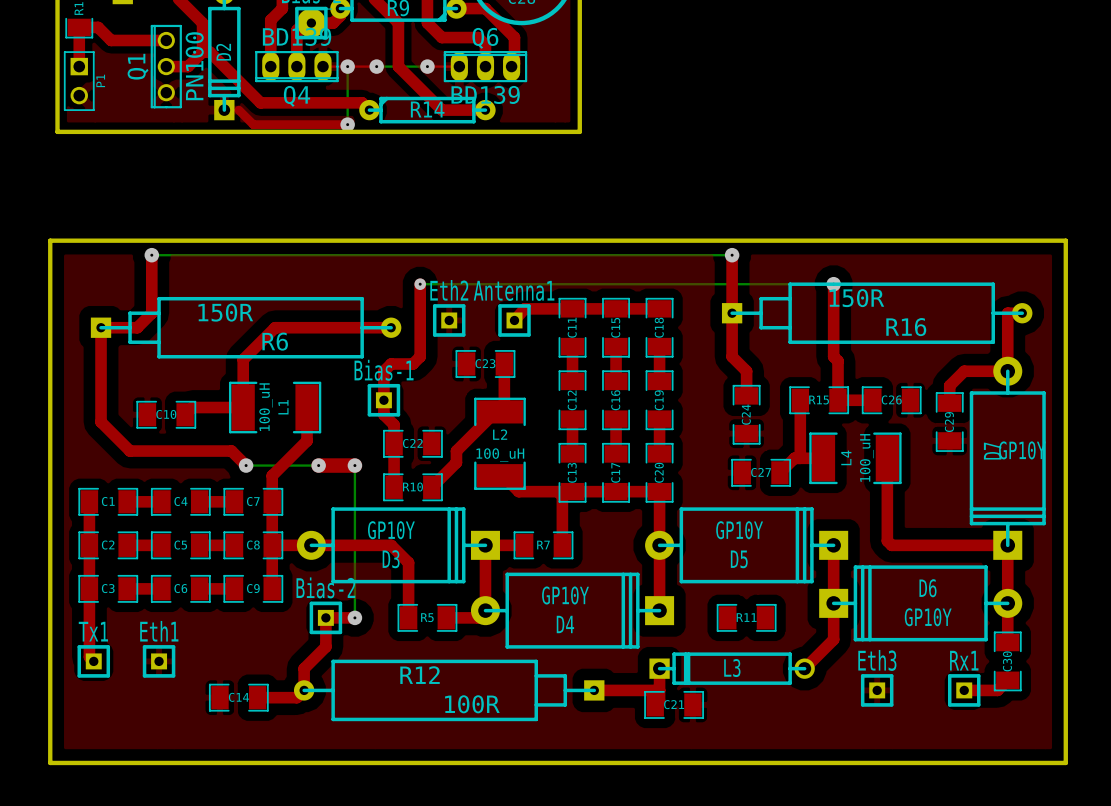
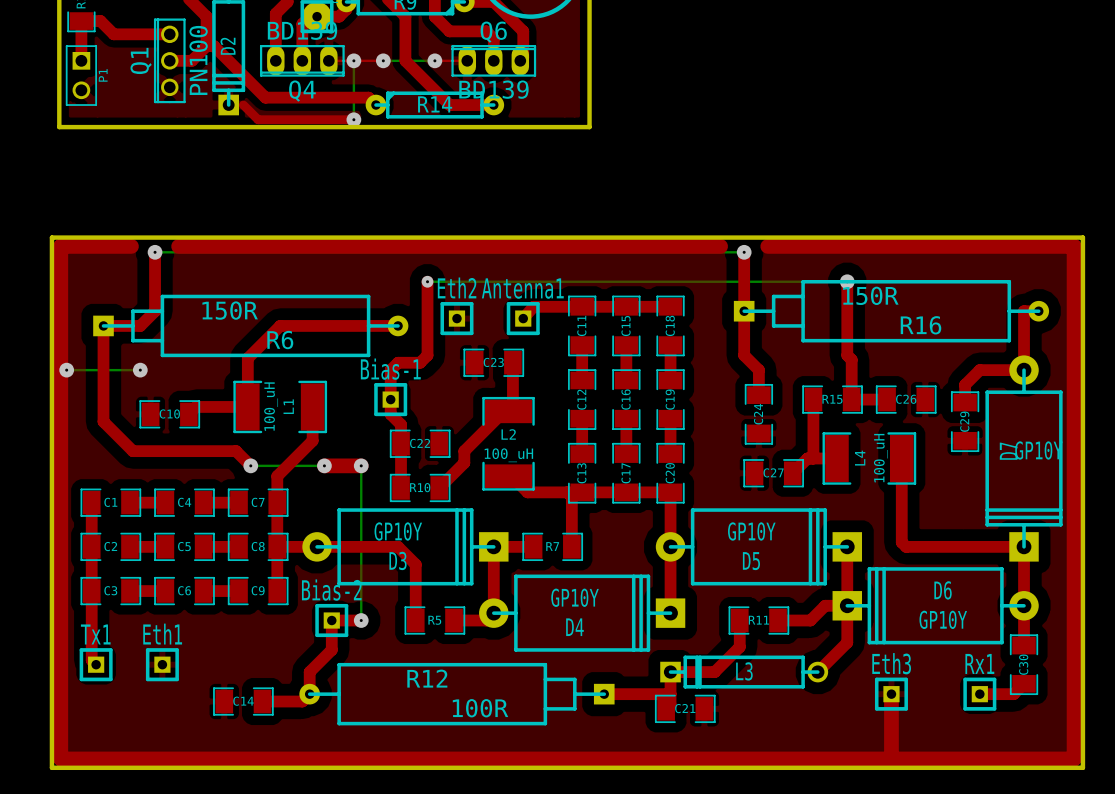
top track: none -> (131, 246) (60, 246) (60, 758) (1074, 758) (1074, 246) (767, 246)
top track: none -> (178, 246) (720, 246)
bottom track: none -> (66, 370) (140, 370)
via: none -> (66, 370)
via: none -> (140, 370)
top track: none -> (847, 605) (825, 605) (810, 620) (778, 620)
top track: none -> (739, 620) (739, 647) (714, 672) (670, 672)
top track: none -> (891, 694) (891, 758)

